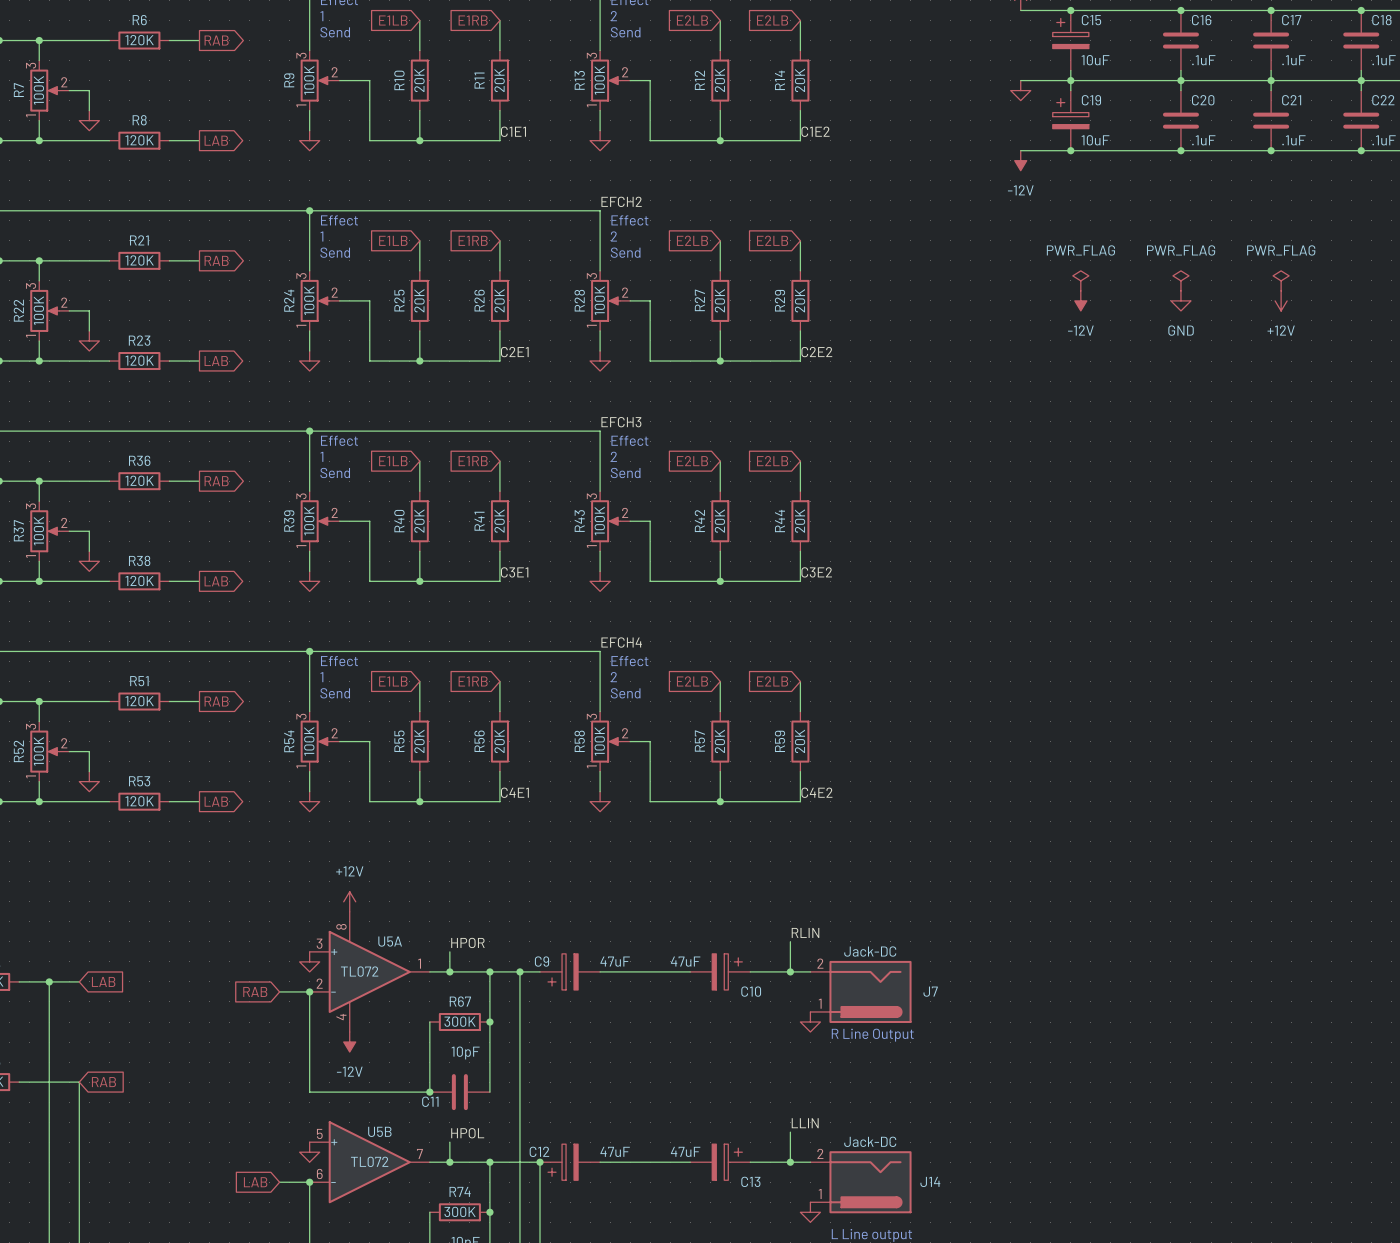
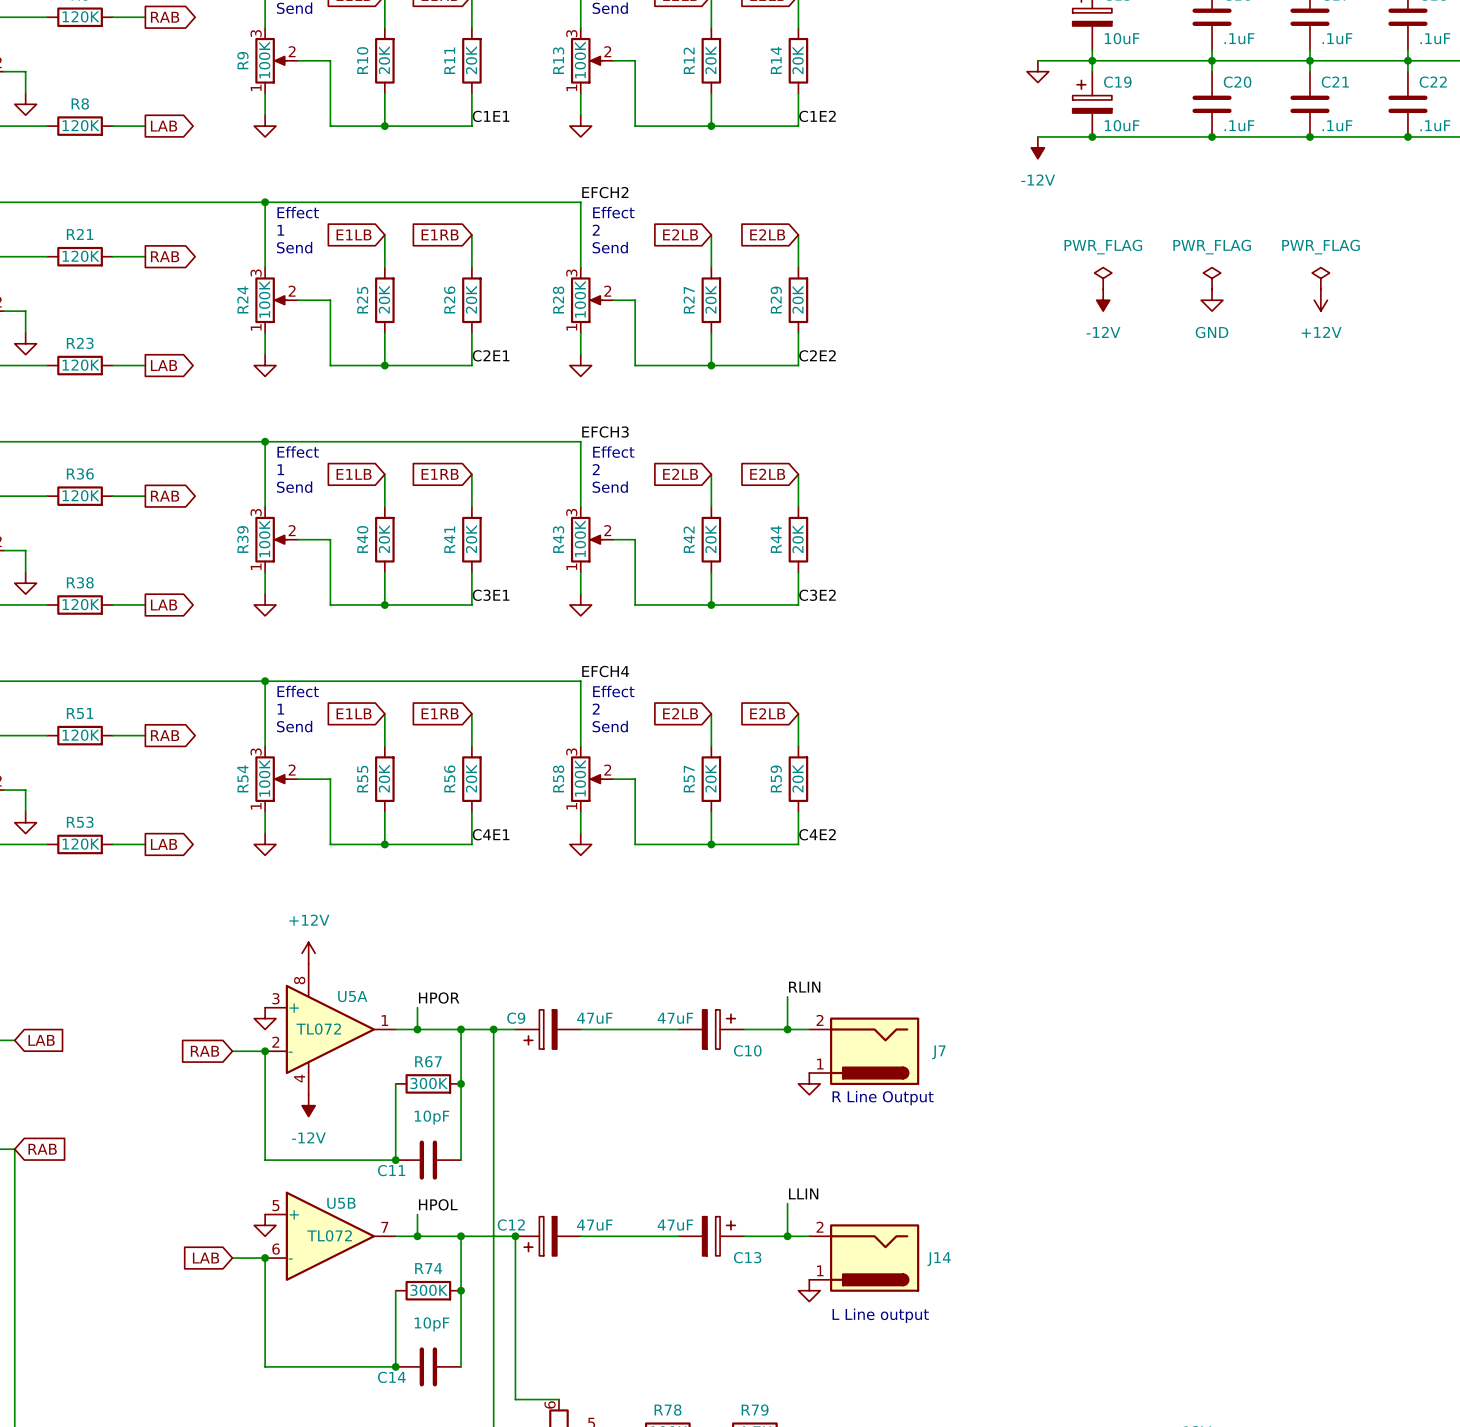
J7 value: Jack-DC (870, 951) -> none
J14 value: Jack-DC (870, 1141) -> none

